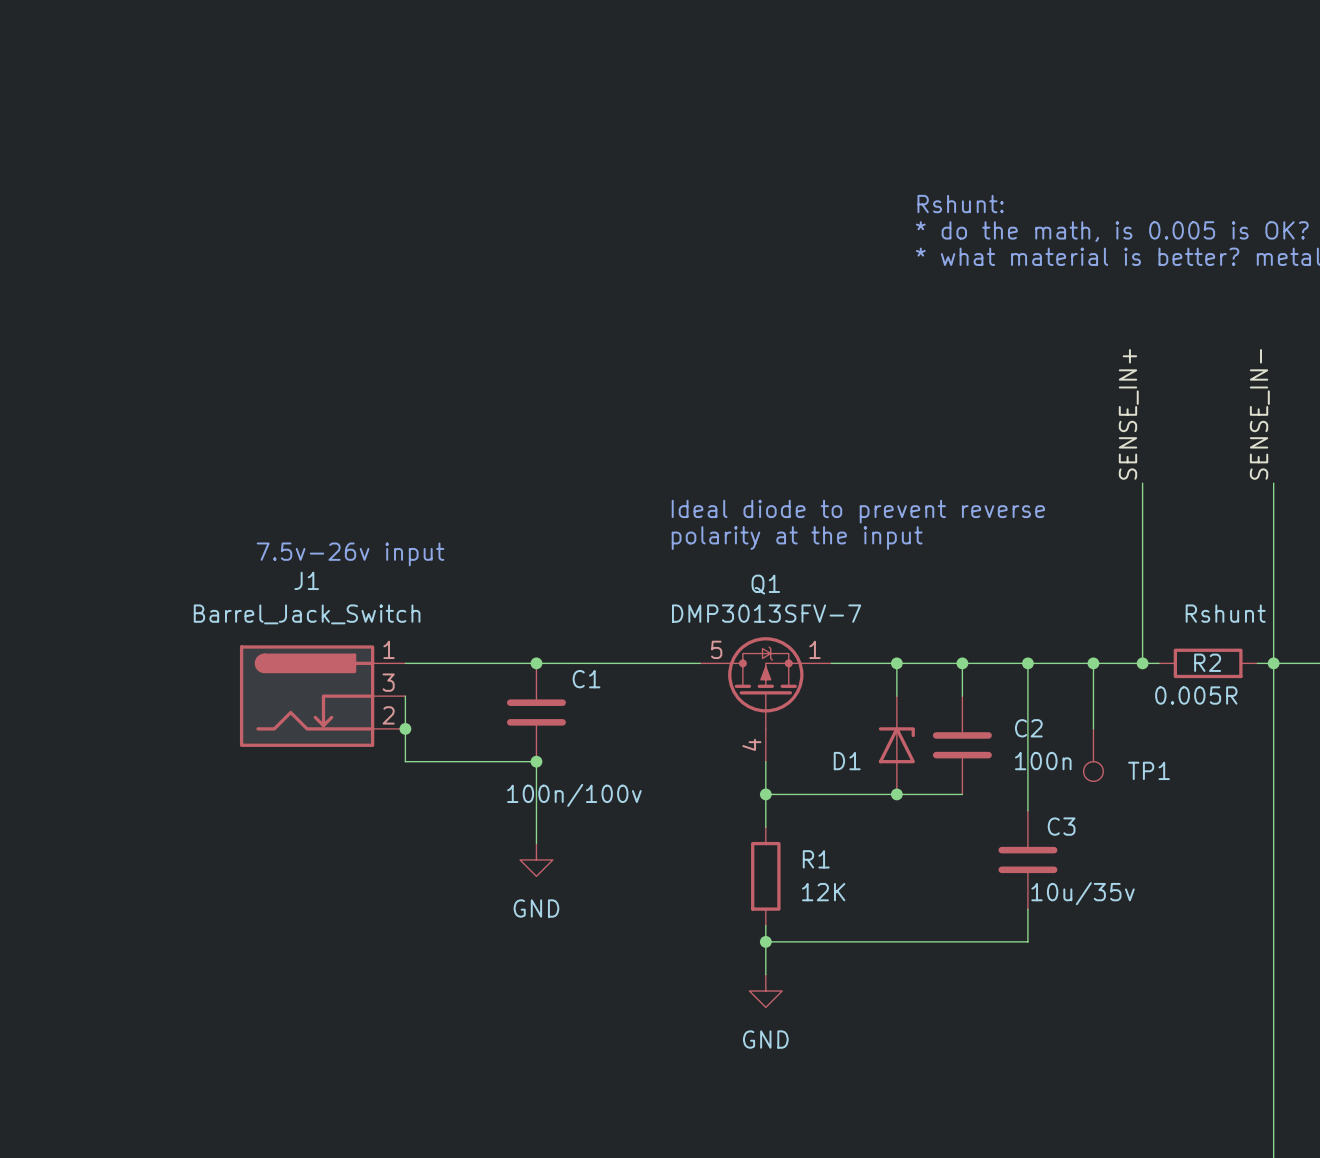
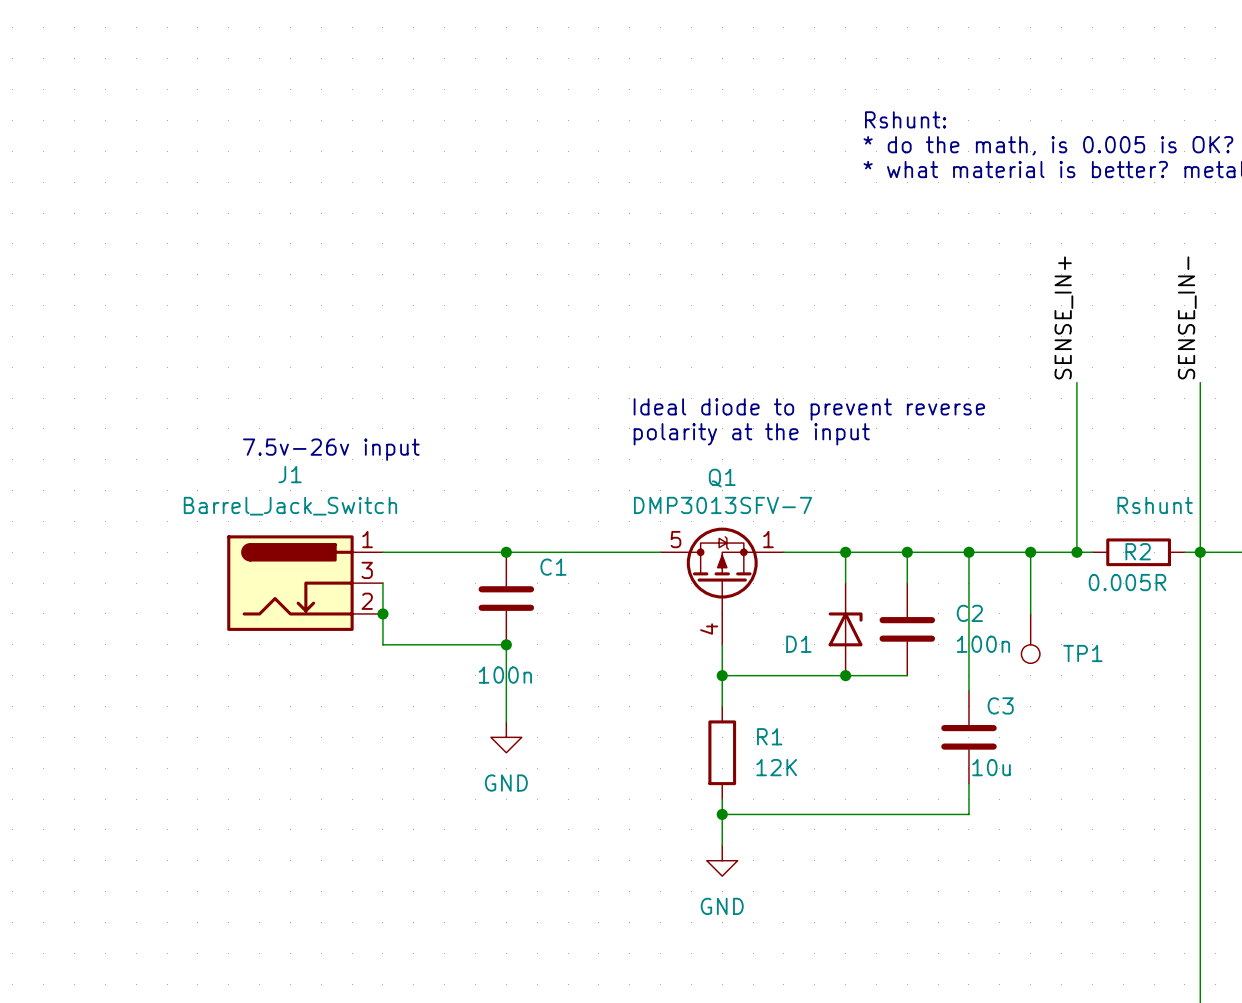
C1 value: 100n/100v (574, 795) -> 100n (505, 675)
C3 value: 10u/35v (1083, 893) -> 10u (991, 767)

